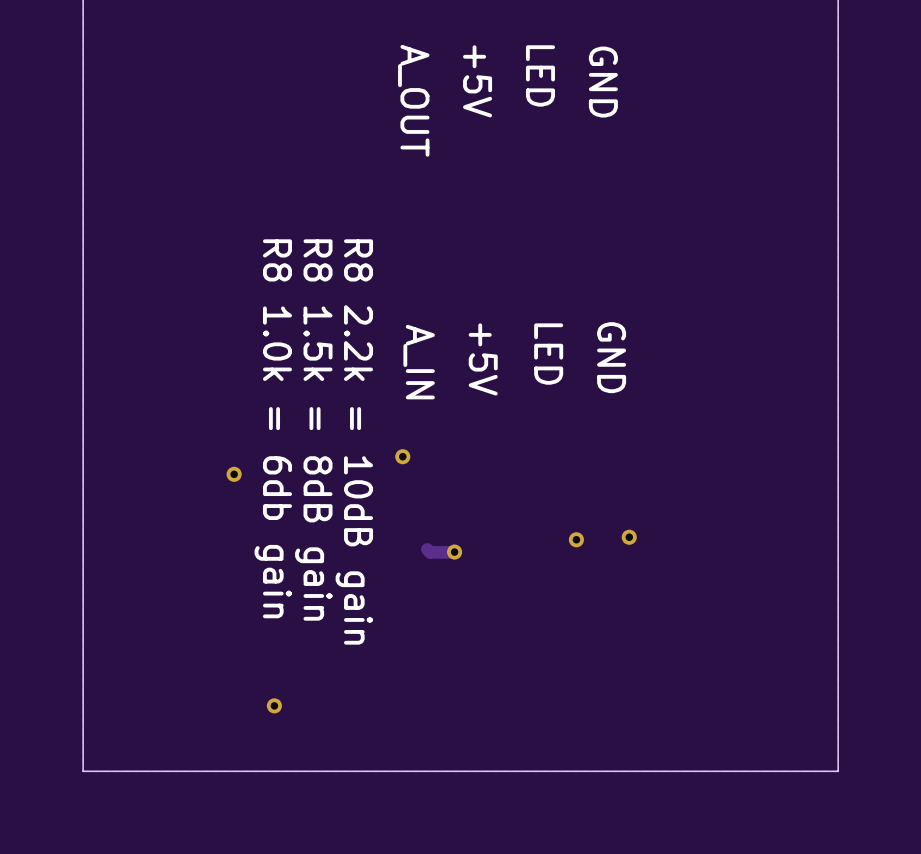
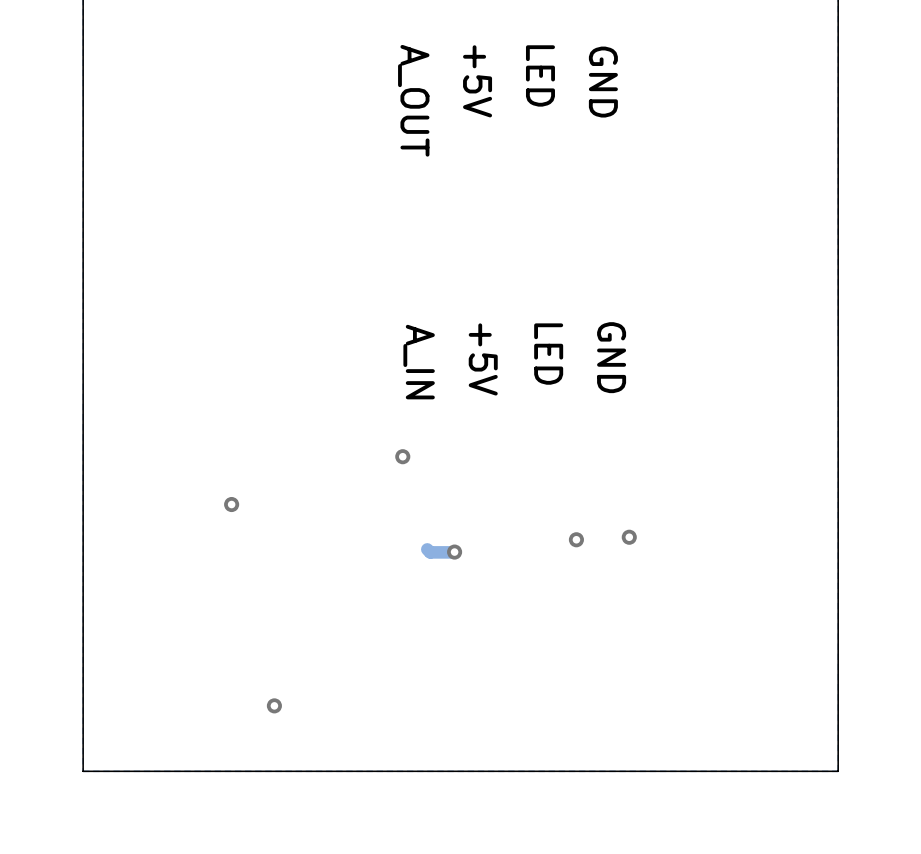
text: R8 1.0k = 6db gain (273, 428) -> none
text: R8 1.5k = 8dB gain (313, 429) -> none
text: R8 2.2k = 10dB gain (354, 441) -> none
via position: (234, 474) -> (231, 504)

